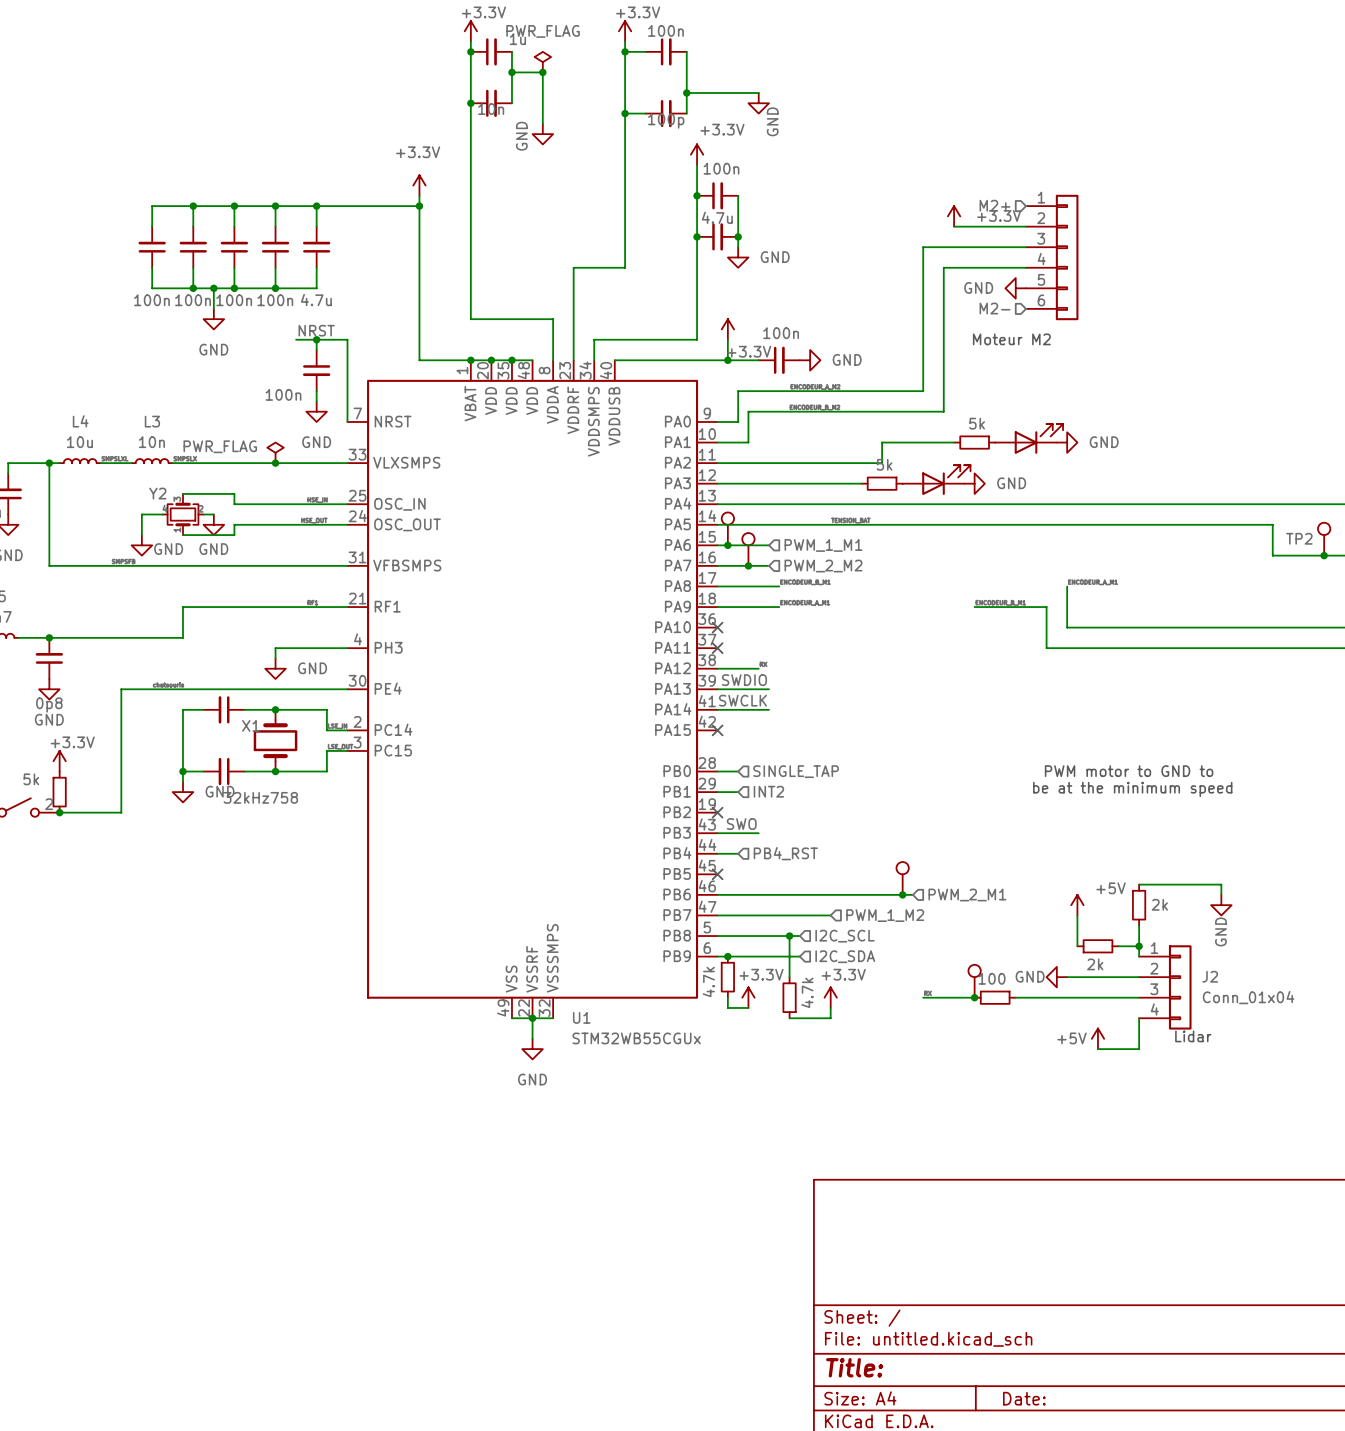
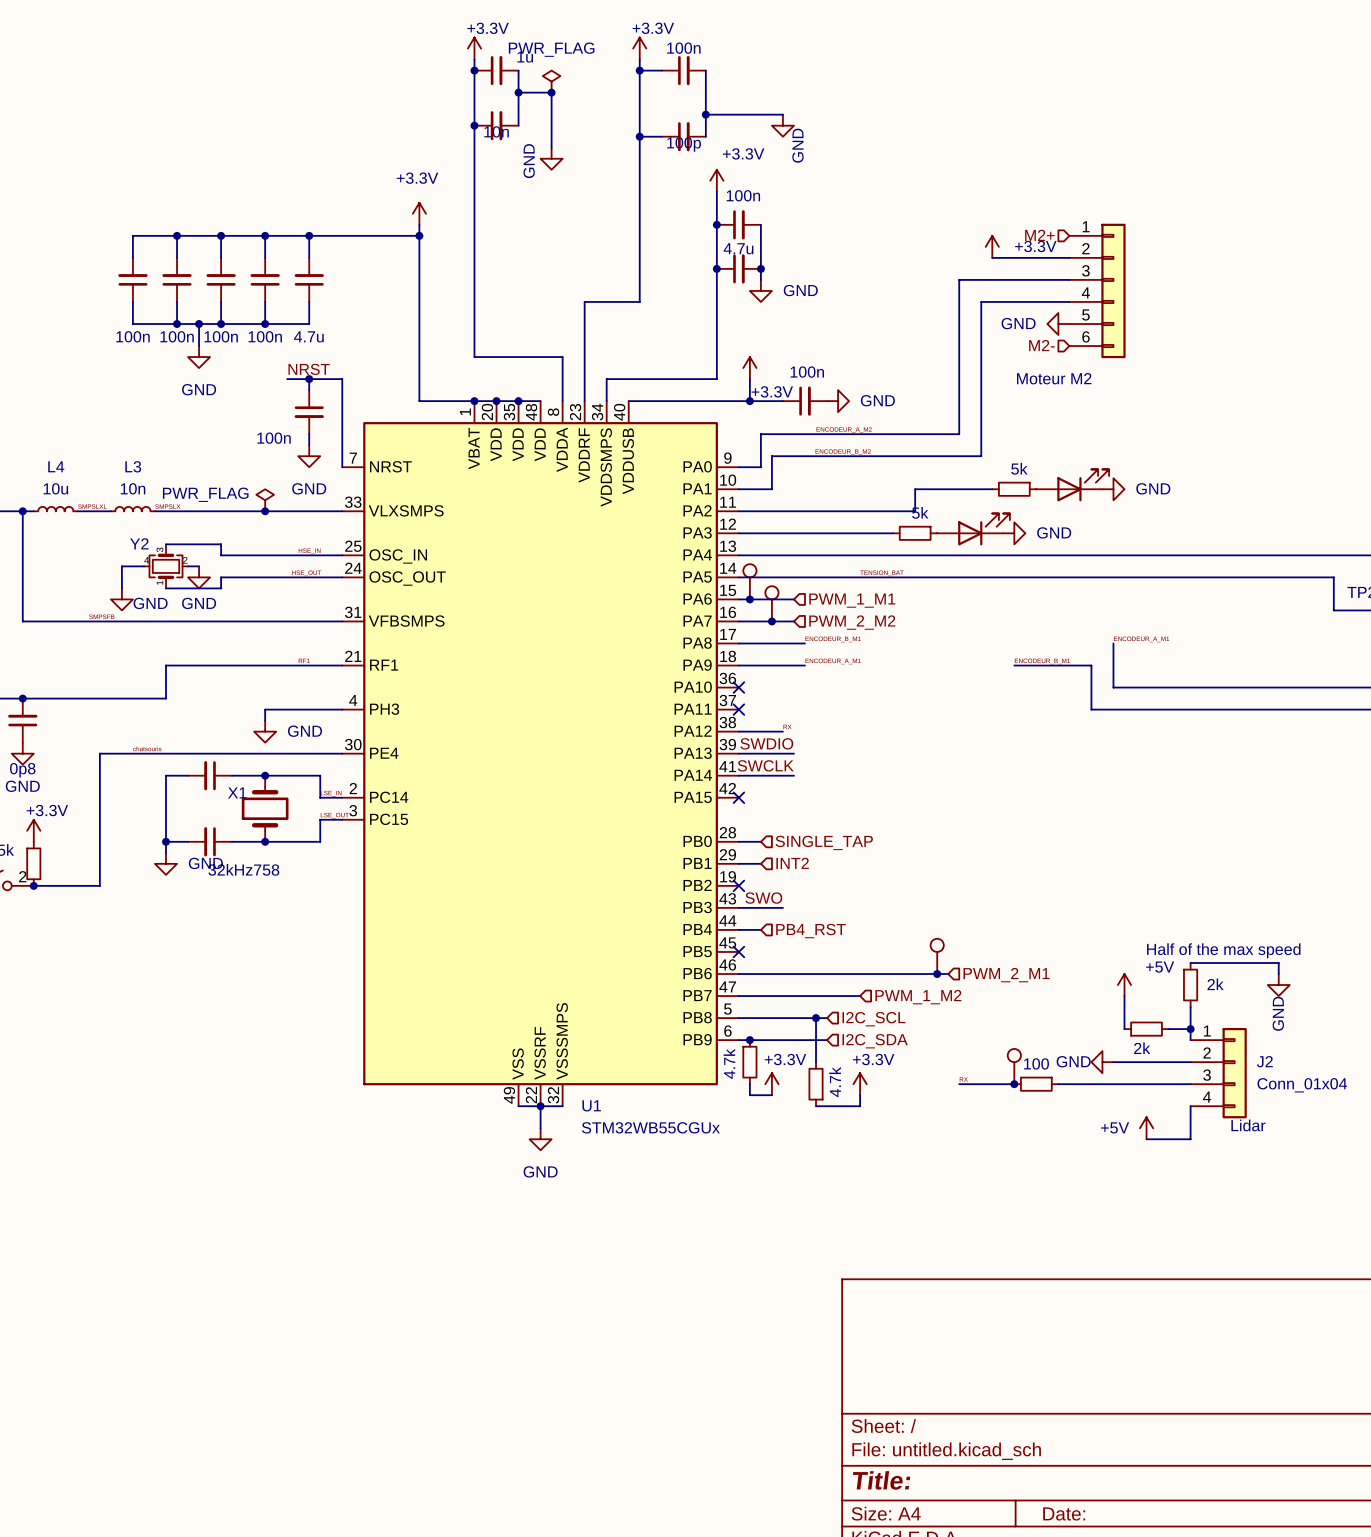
text: PWM motor to GND to (1129, 771) -> none
text: be at the minimum speed (1132, 789) -> none
text: none -> Half of the max speed (1223, 950)

